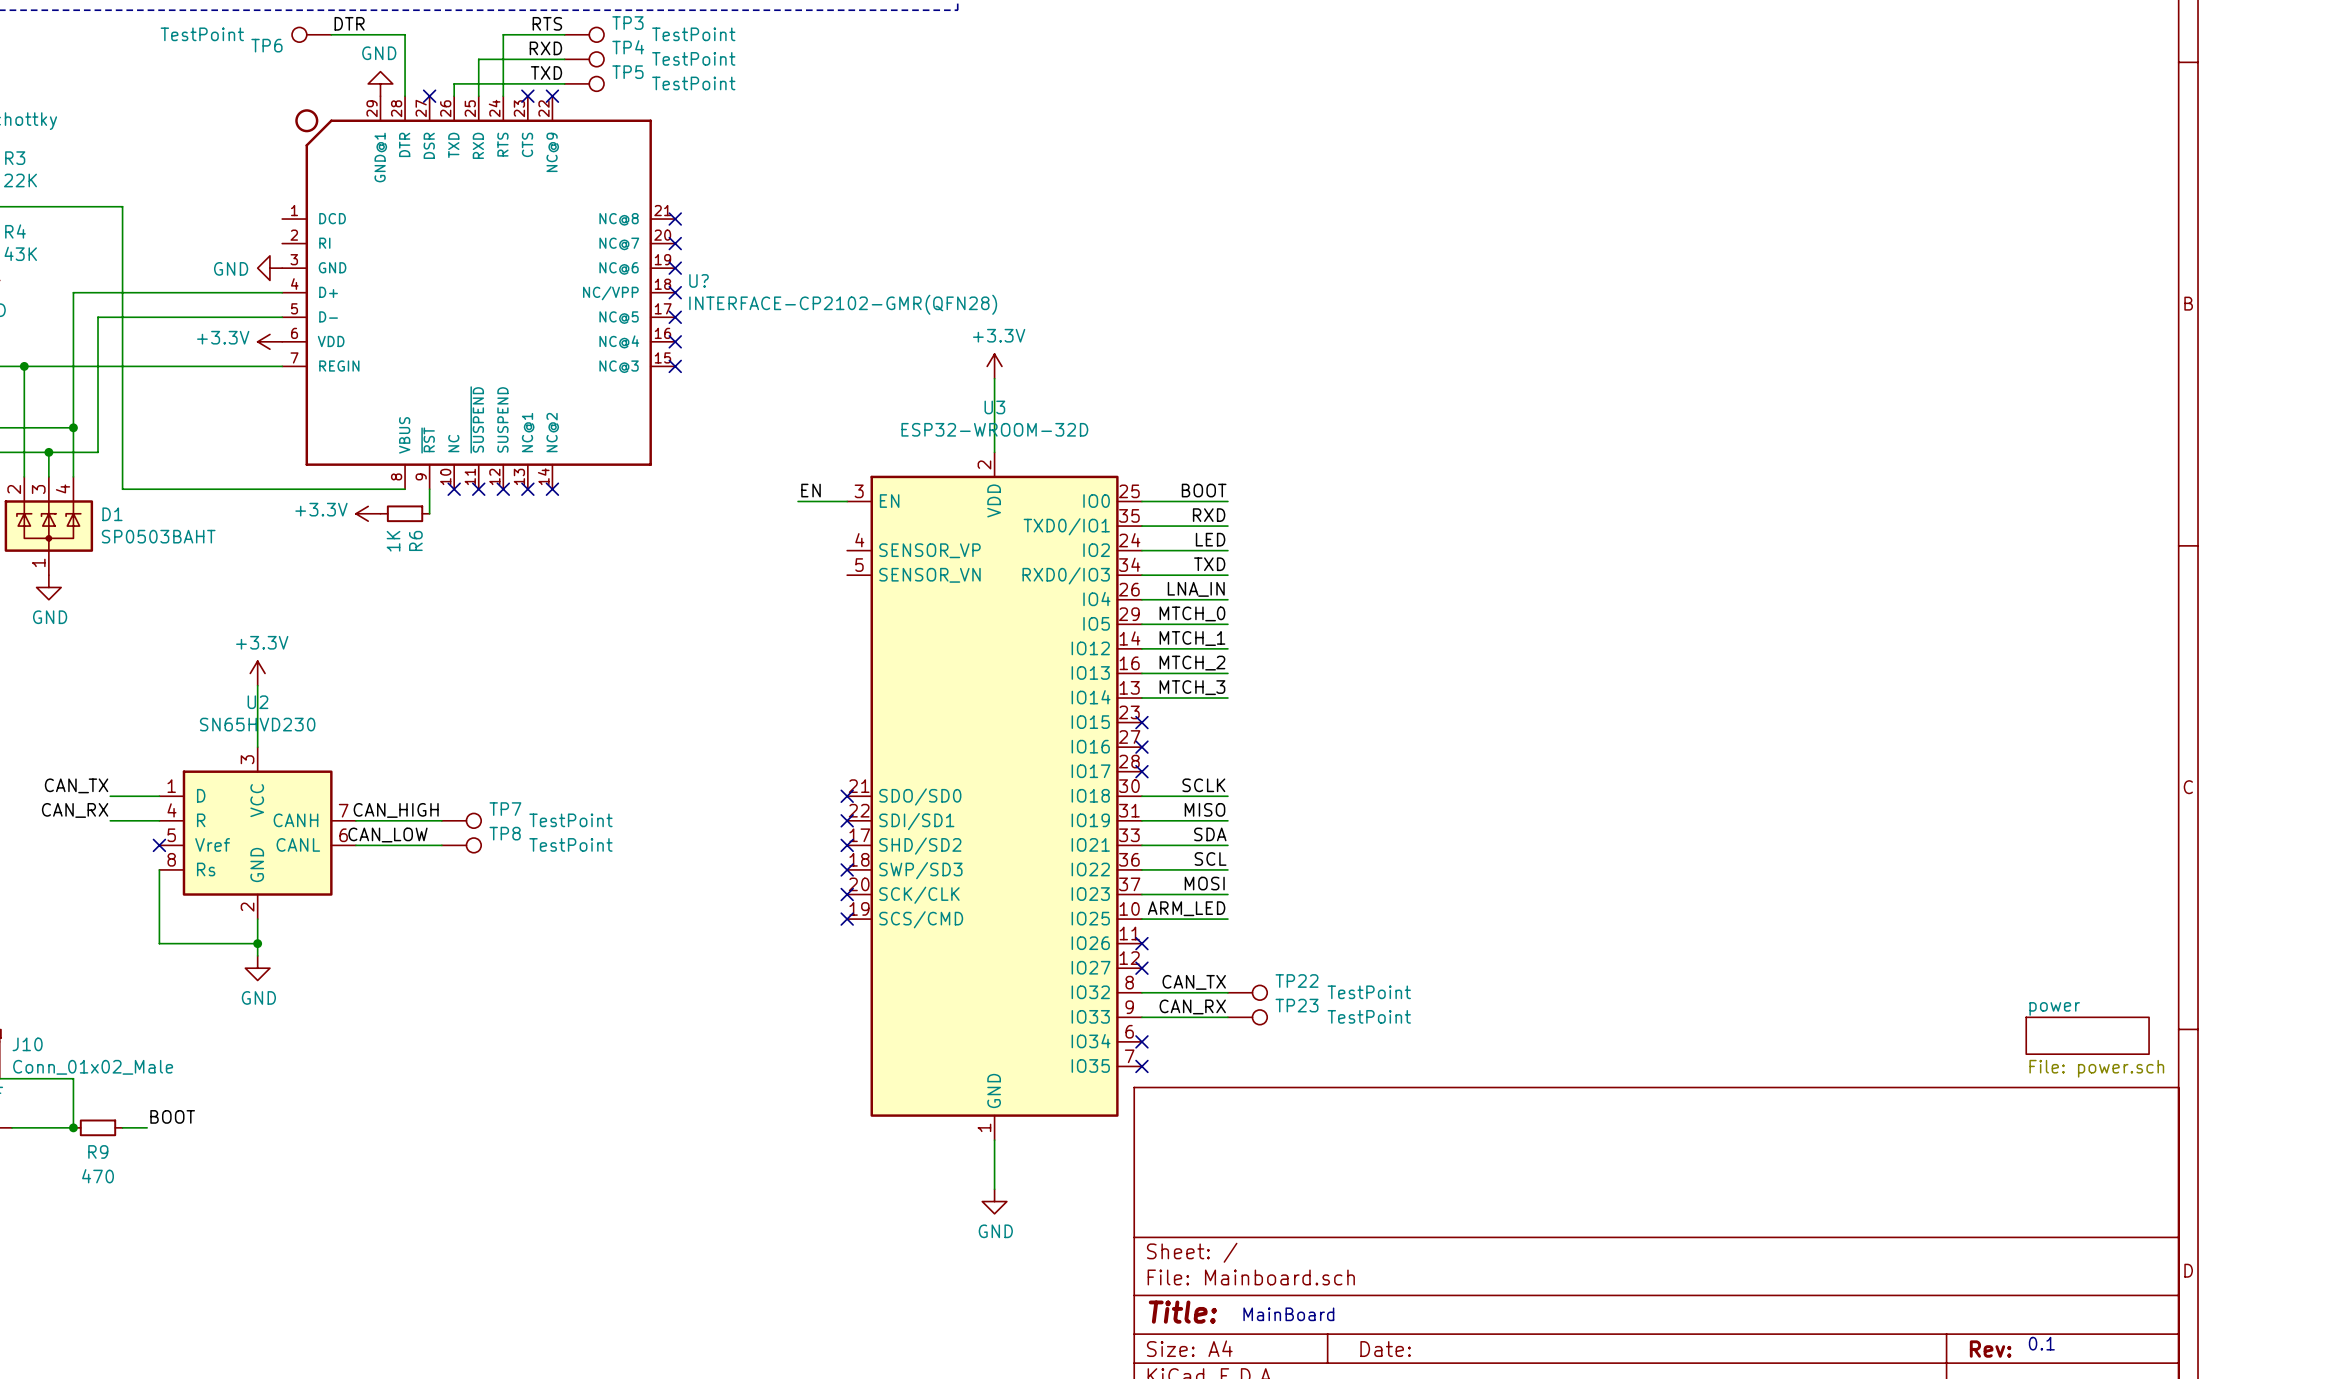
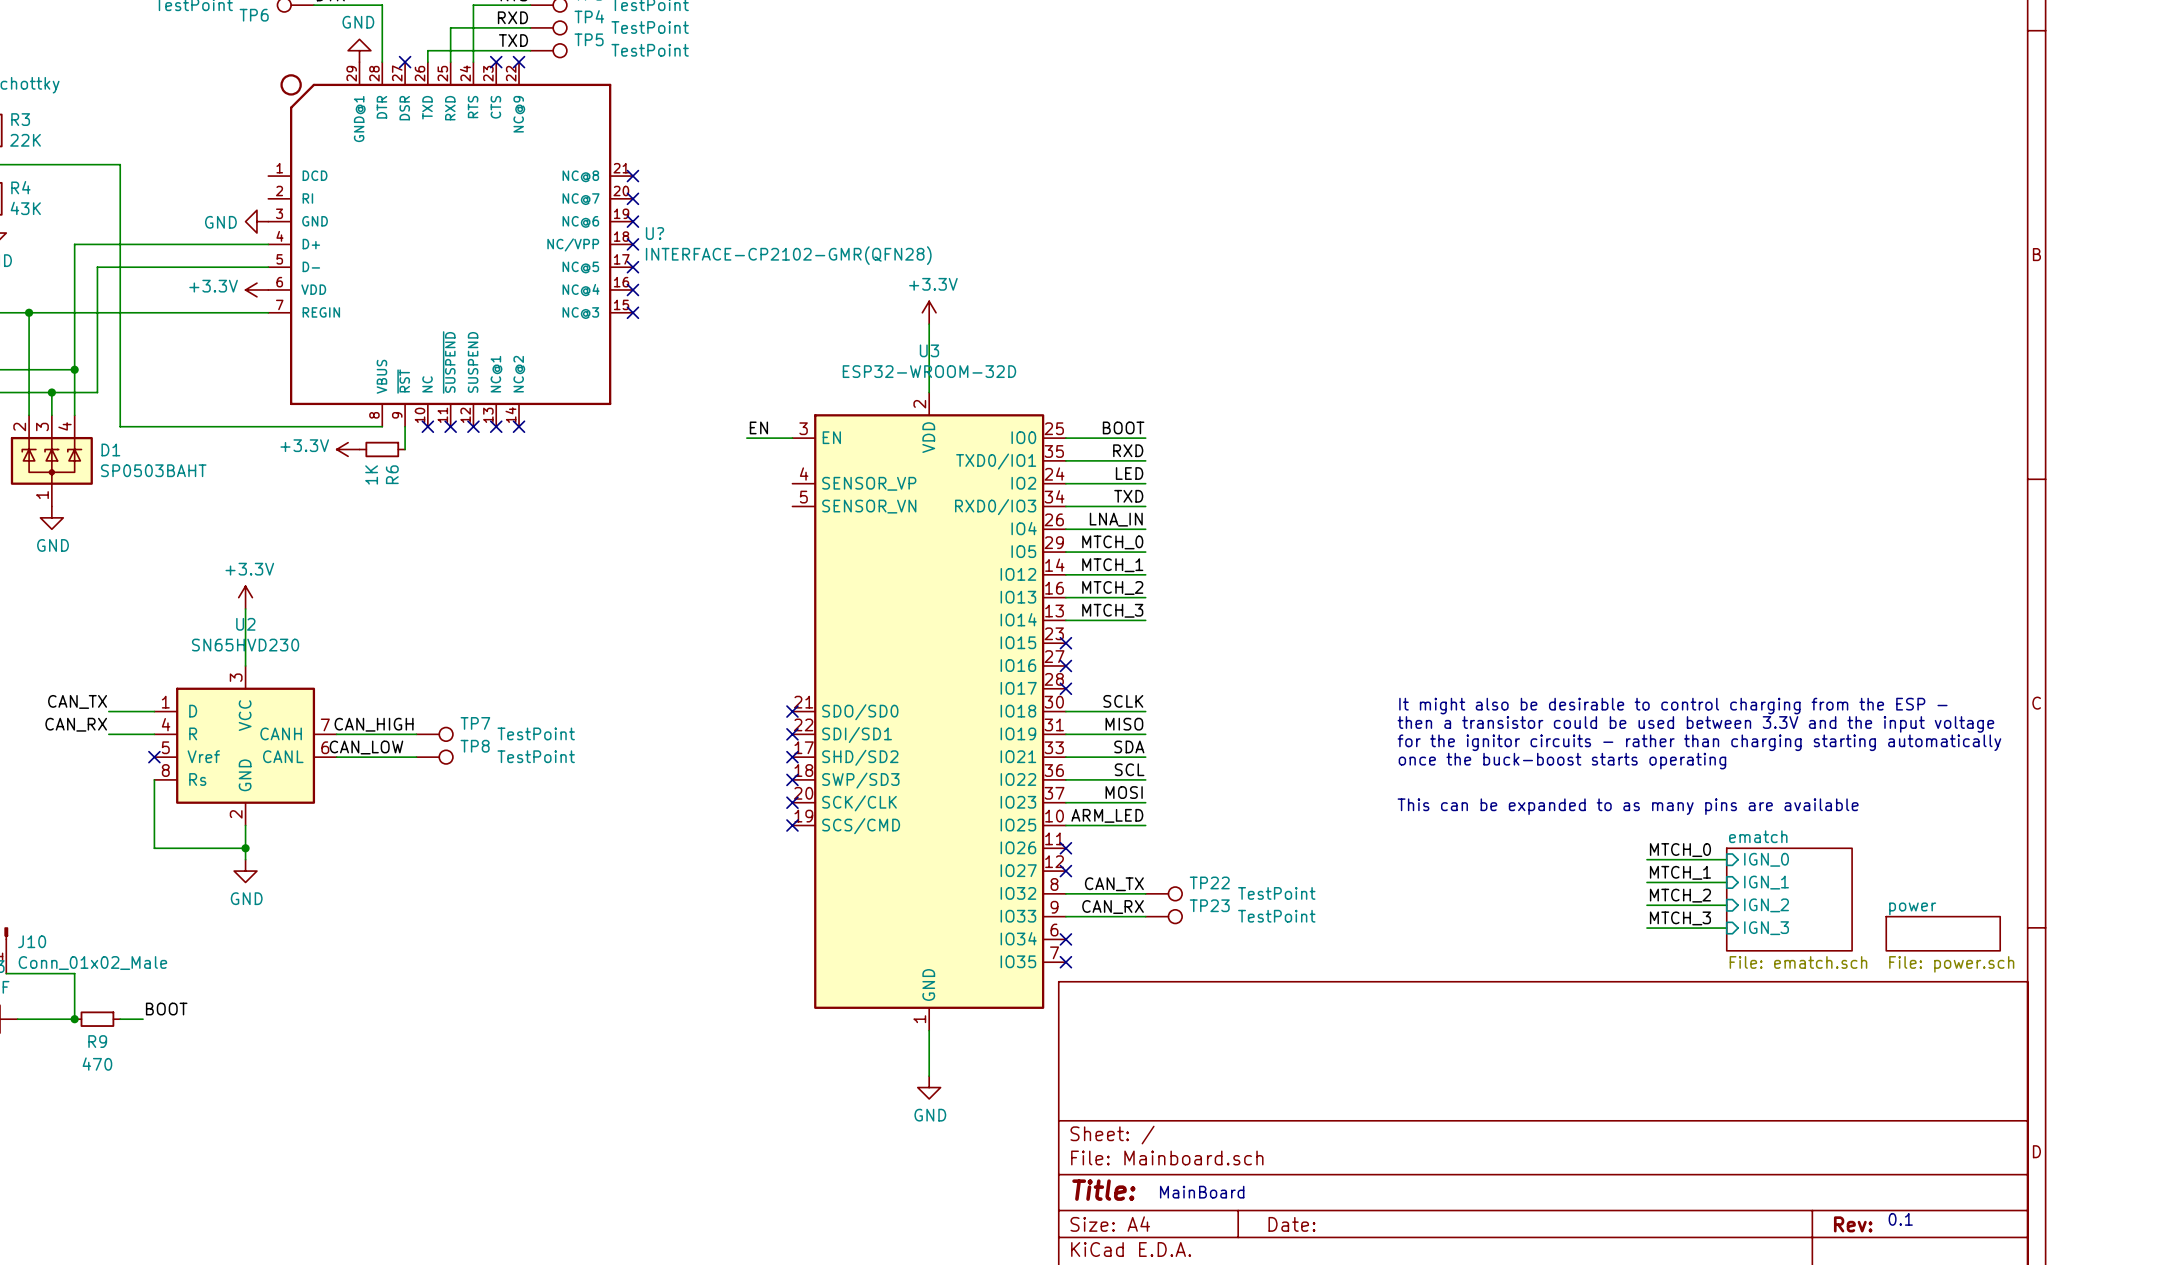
text: none -> It might also be desirable to control charging from the ESP - (1673, 706)
text: none -> then a transistor could be used between 3.3V and the input voltage (1695, 724)
text: none -> for the ignitor circuits - rather than charging starting automatically (1699, 742)
text: none -> once the buck-boost starts operating (1562, 761)
text: none -> This can be expanded to as many pins are available (1628, 806)
label: none -> MTCH_0 (1680, 850)
wire: none -> (1646, 859) (1726, 859)
sheet pin: none -> IGN_0 (1766, 859)
label: none -> MTCH_1 (1680, 872)
wire: none -> (1646, 882) (1726, 882)
sheet pin: none -> IGN_1 (1766, 882)
label: none -> MTCH_2 (1680, 895)
sheet ematch: none -> File: ematch.sch (1789, 899)
wire: none -> (1646, 905) (1726, 905)
sheet pin: none -> IGN_2 (1766, 905)
label: none -> MTCH_3 (1680, 918)
wire: none -> (1646, 928) (1726, 928)
sheet pin: none -> IGN_3 (1766, 928)

